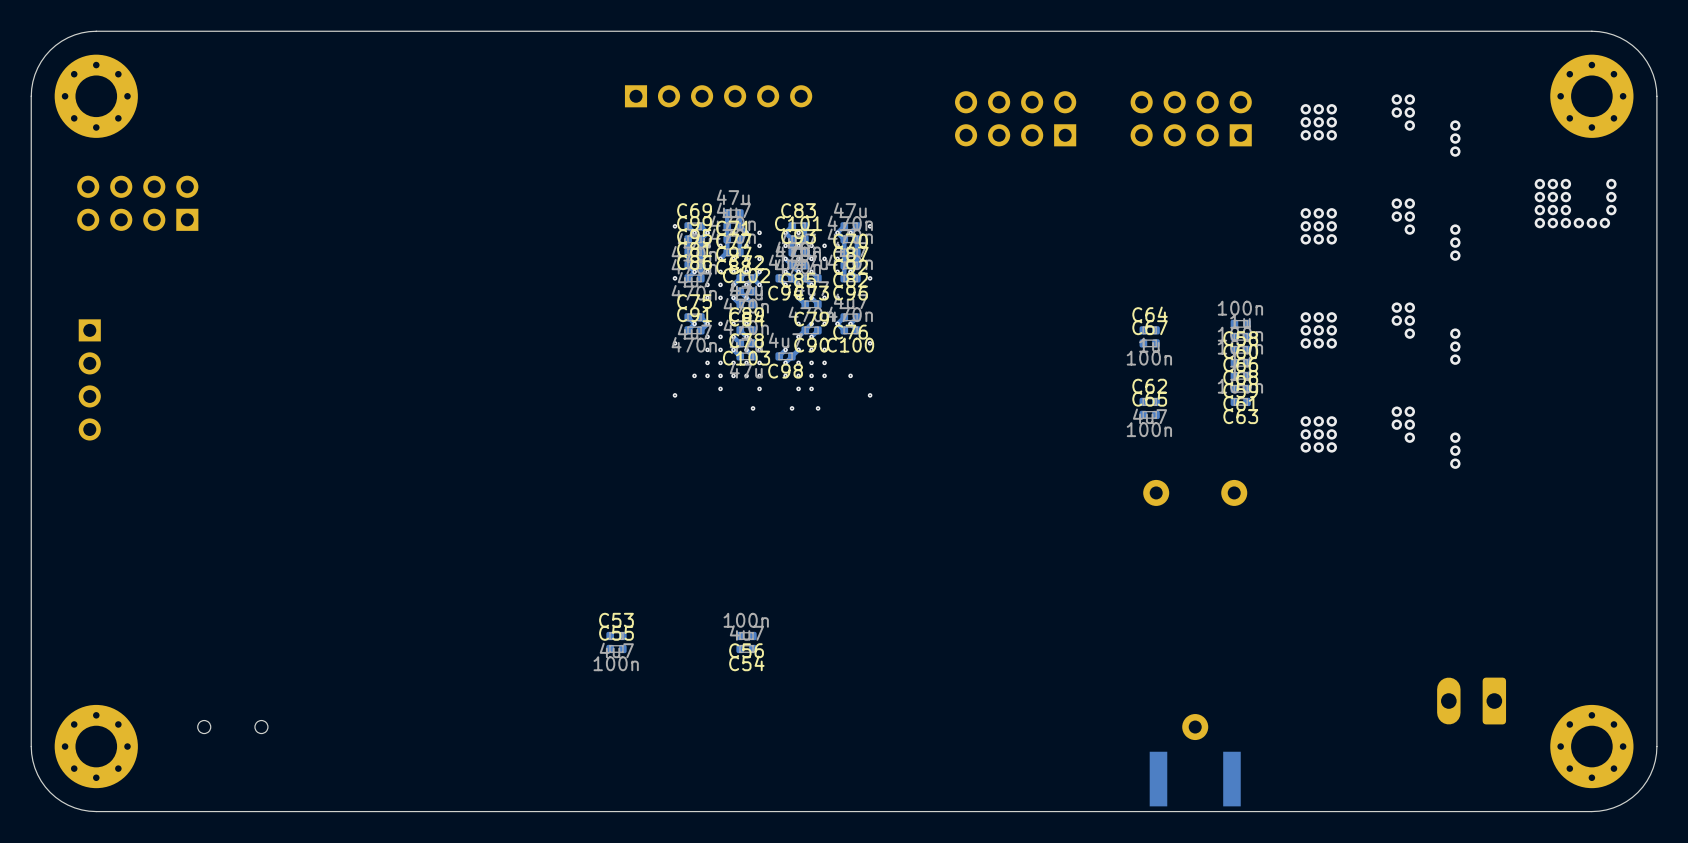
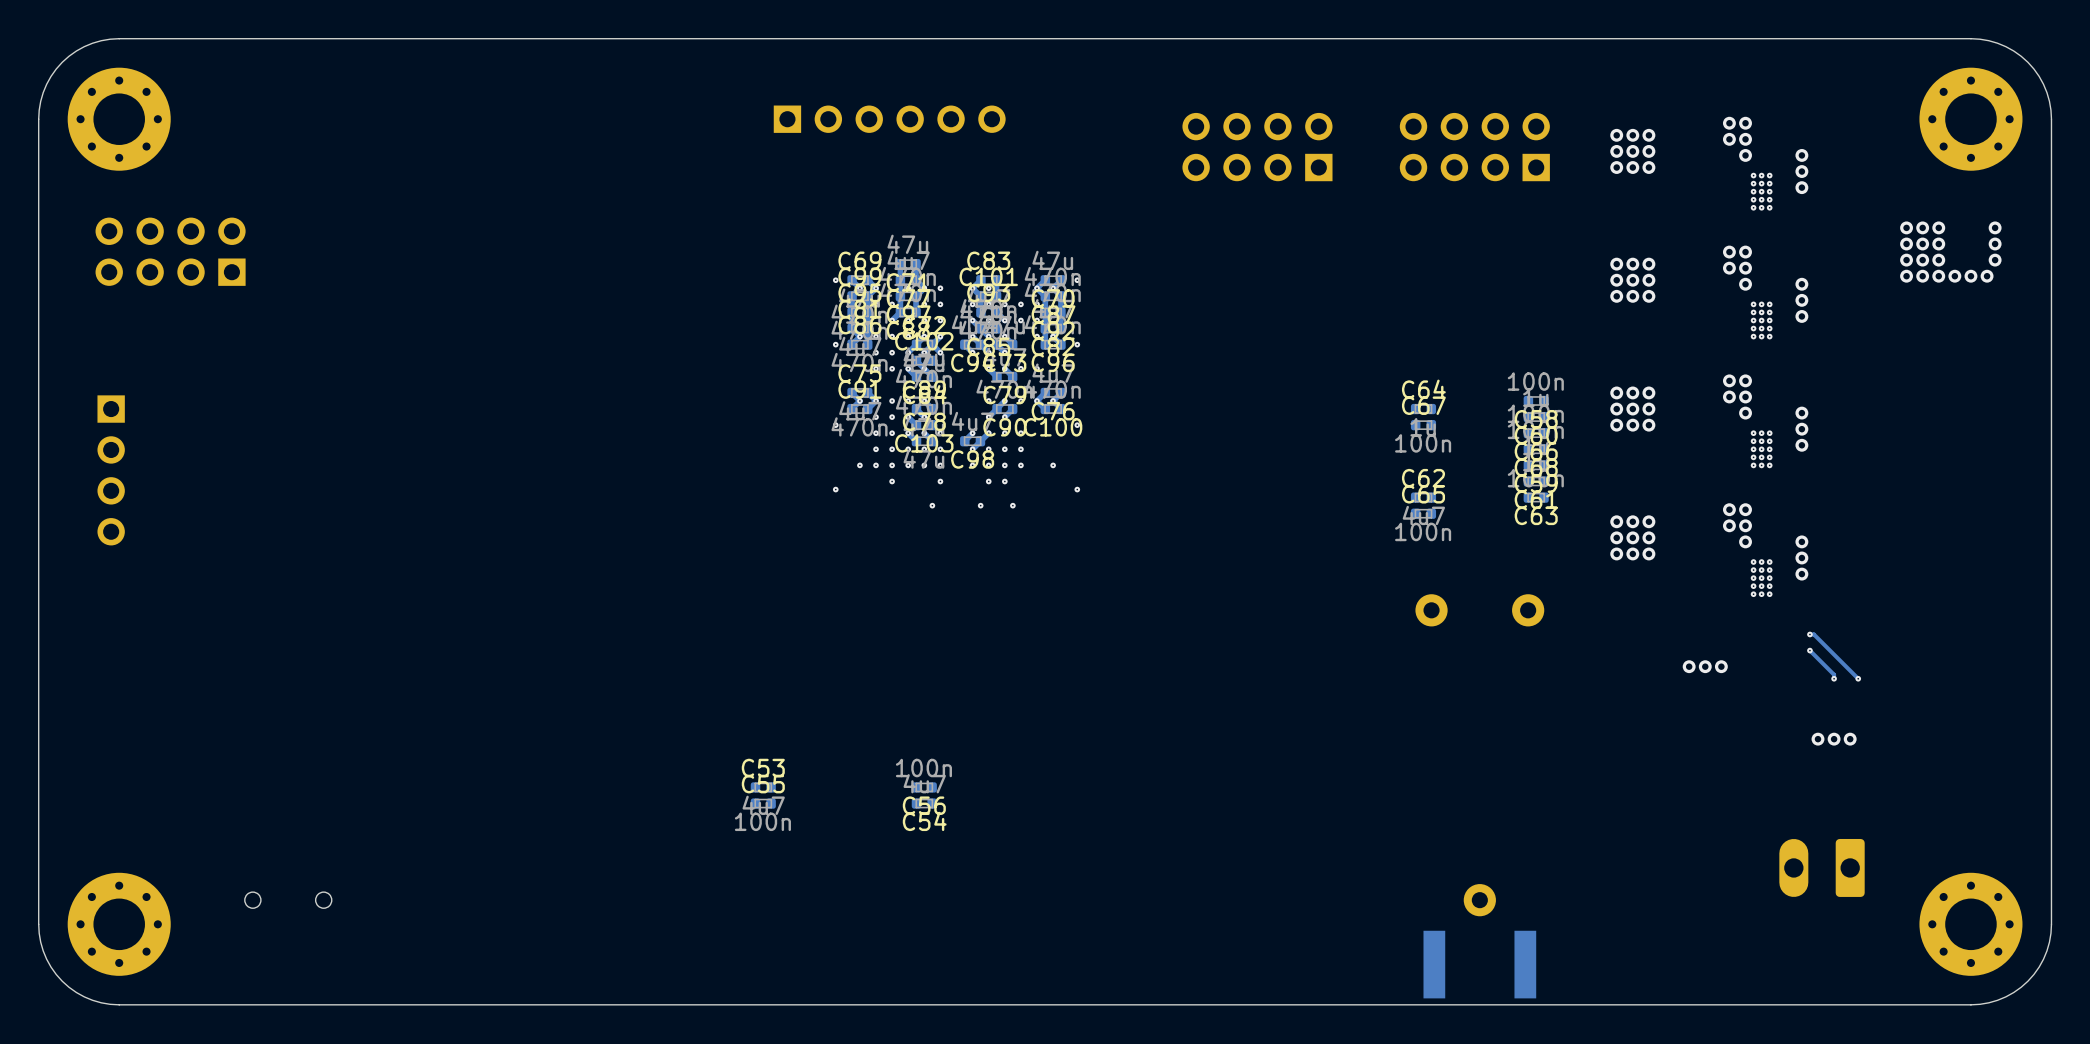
via: none -> (1753, 175)
via: none -> (1761, 175)
via: none -> (1769, 175)
via: none -> (1753, 183)
via: none -> (1761, 183)
via: none -> (1769, 183)
via: none -> (1753, 191)
via: none -> (1761, 191)
via: none -> (1769, 191)
via: none -> (1753, 199)
via: none -> (1761, 199)
via: none -> (1769, 199)
via: none -> (1753, 207)
via: none -> (1761, 207)
via: none -> (1769, 207)
via: none -> (1753, 304)
via: none -> (1761, 304)
via: none -> (1769, 304)
via: none -> (1753, 312)
via: none -> (1761, 312)
via: none -> (1769, 312)
via: none -> (1753, 320)
via: none -> (1761, 320)
via: none -> (1769, 320)
via: none -> (1753, 328)
via: none -> (1761, 328)
via: none -> (1769, 328)
via: none -> (1753, 336)
via: none -> (1761, 336)
via: none -> (1769, 336)
via: none -> (1753, 433)
via: none -> (1761, 433)
via: none -> (1769, 433)
via: none -> (1753, 441)
via: none -> (1761, 441)
via: none -> (1769, 441)
via: none -> (1753, 449)
via: none -> (1761, 449)
via: none -> (1769, 449)
via: none -> (1753, 457)
via: none -> (1761, 457)
via: none -> (1769, 457)
via: none -> (1753, 465)
via: none -> (1761, 465)
via: none -> (1769, 465)
via: none -> (1753, 562)
via: none -> (1761, 562)
via: none -> (1769, 562)
via: none -> (1753, 570)
via: none -> (1761, 570)
via: none -> (1769, 570)
via: none -> (1753, 578)
via: none -> (1761, 578)
via: none -> (1769, 578)
via: none -> (1753, 586)
via: none -> (1761, 586)
via: none -> (1769, 586)
via: none -> (1753, 594)
via: none -> (1761, 594)
via: none -> (1769, 594)
track: none -> (1809, 634) (1813, 634) (1858, 678)
via: none -> (1809, 634)
track: none -> (1809, 650) (1834, 674) (1834, 678)
via: none -> (1809, 650)
via: none -> (1689, 666)
via: none -> (1705, 666)
via: none -> (1721, 666)
via: none -> (1834, 678)
via: none -> (1858, 678)
via: none -> (1817, 739)
via: none -> (1834, 739)
via: none -> (1850, 739)

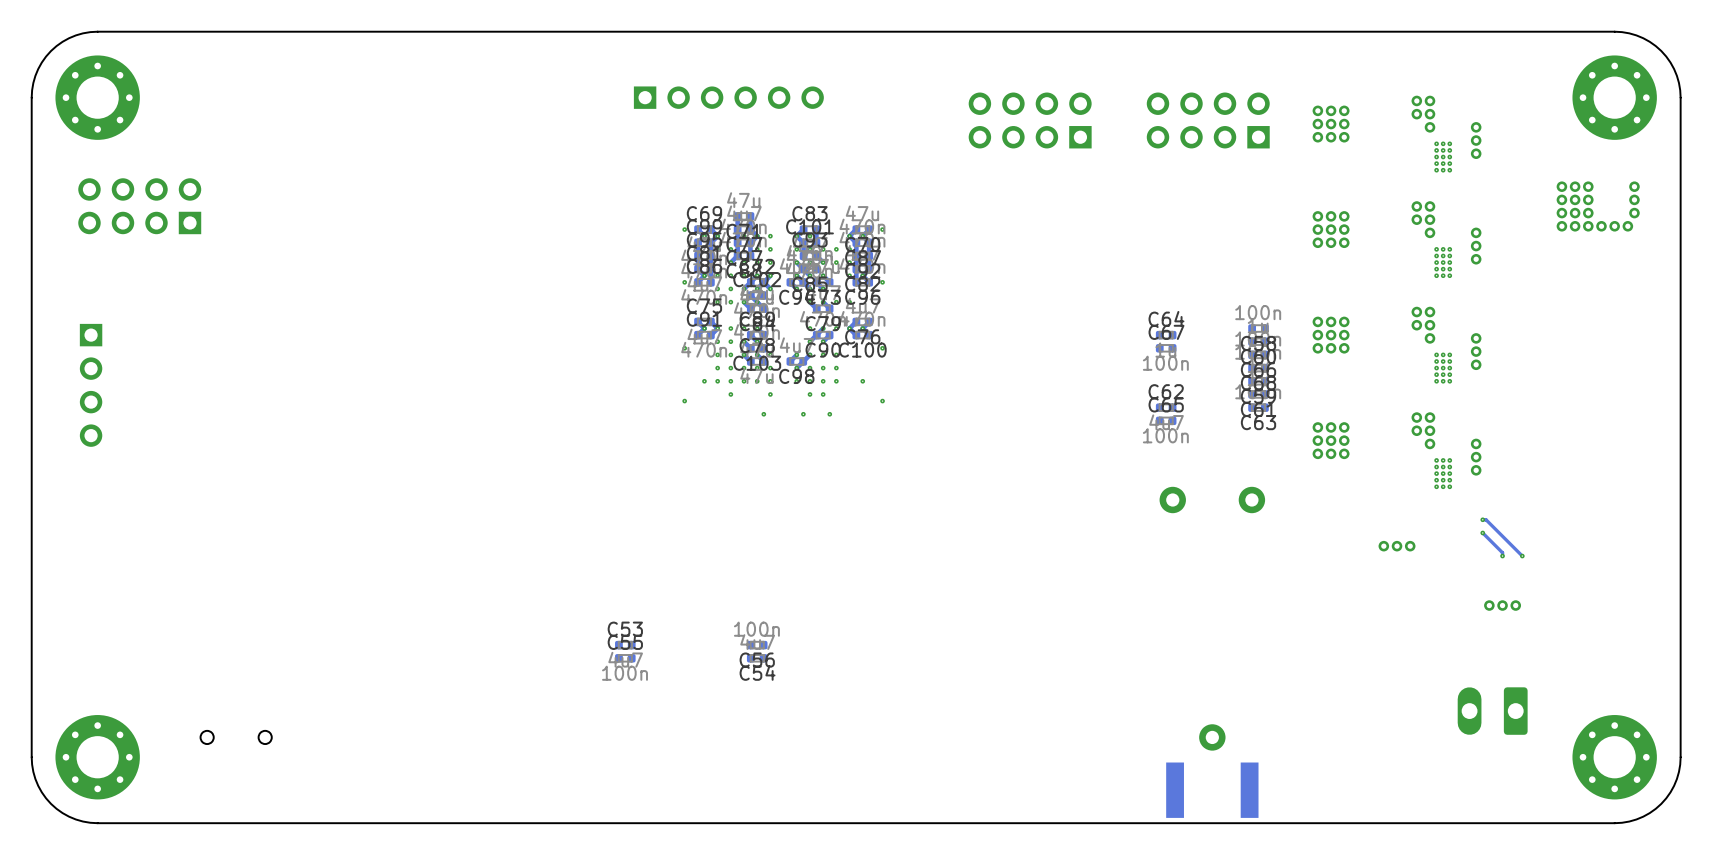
via: none -> (1317, 110)
via: (1616, 135) -> none
via: none -> (1331, 110)
via: (1632, 135) -> none
via: none -> (1344, 110)
via: (1648, 135) -> none
via: none -> (1317, 124)
via: (1616, 151) -> none
via: none -> (1331, 124)
via: (1632, 151) -> none
via: none -> (1344, 124)
via: (1648, 151) -> none
via: none -> (1317, 137)
via: (1616, 167) -> none
via: none -> (1331, 137)
via: (1632, 167) -> none
via: none -> (1344, 137)
via: (1648, 167) -> none
via: none -> (1317, 216)
via: (1616, 264) -> none
via: none -> (1331, 216)
via: (1632, 264) -> none
via: none -> (1344, 216)
via: (1648, 264) -> none
via: none -> (1317, 229)
via: (1616, 280) -> none
via: none -> (1331, 229)
via: (1632, 280) -> none
via: none -> (1344, 229)
via: (1648, 280) -> none
via: none -> (1317, 242)
via: (1616, 296) -> none
via: none -> (1331, 242)
via: (1632, 296) -> none
via: none -> (1344, 242)
via: (1648, 296) -> none
via: none -> (1317, 321)
via: (1616, 392) -> none
via: none -> (1331, 321)
via: (1632, 392) -> none
via: none -> (1344, 321)
via: (1648, 392) -> none
via: none -> (1317, 335)
via: (1616, 409) -> none
via: none -> (1331, 335)
via: (1632, 409) -> none
via: none -> (1344, 335)
via: (1648, 409) -> none
via: none -> (1317, 348)
via: (1616, 425) -> none
via: none -> (1331, 348)
via: (1632, 425) -> none
via: none -> (1344, 348)
via: (1648, 425) -> none
via: none -> (1317, 427)
via: (1616, 521) -> none
via: none -> (1331, 427)
via: (1632, 521) -> none
via: none -> (1344, 427)
via: (1648, 521) -> none
via: none -> (1317, 440)
via: (1616, 537) -> none
via: none -> (1331, 440)
via: (1632, 537) -> none
via: none -> (1344, 440)
via: (1648, 537) -> none
via: none -> (1317, 453)
via: (1616, 553) -> none
via: none -> (1331, 453)
via: (1632, 553) -> none
via: none -> (1344, 453)
via: (1648, 553) -> none

